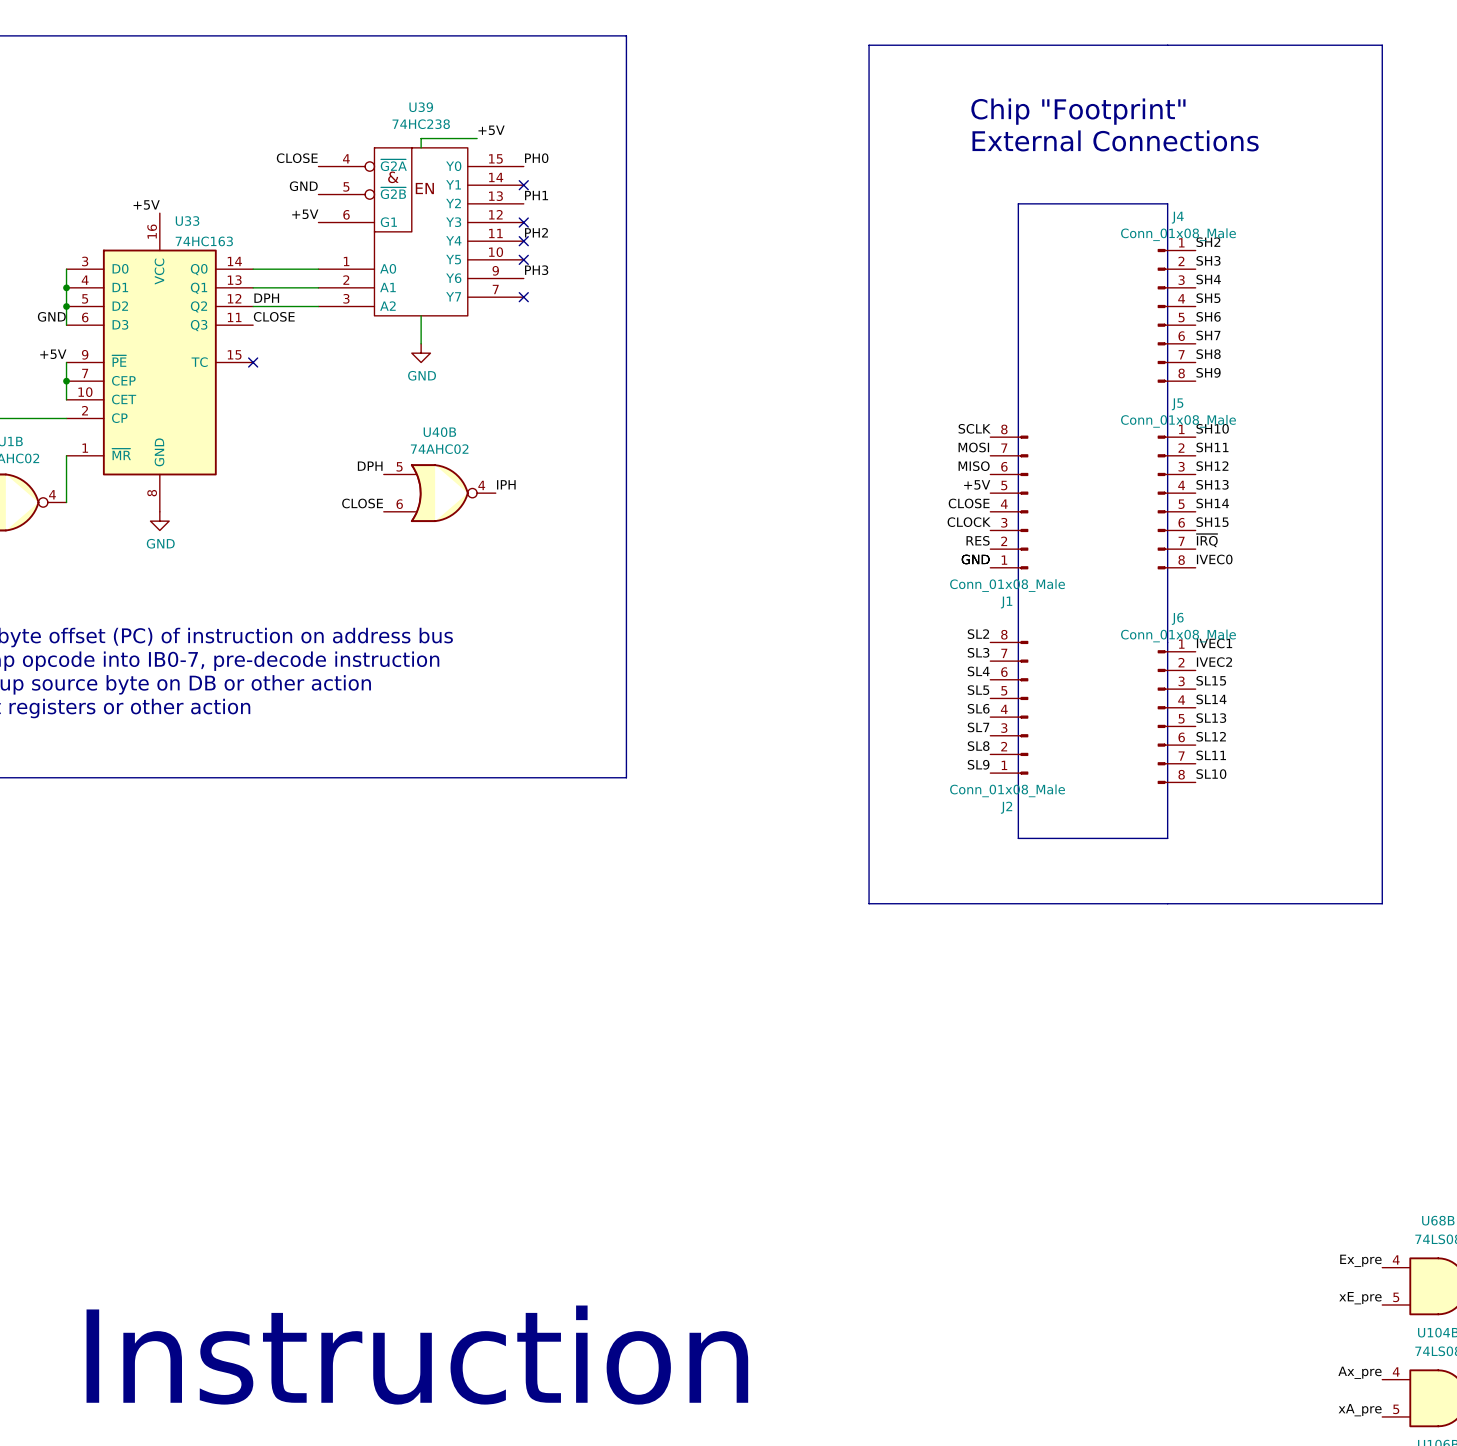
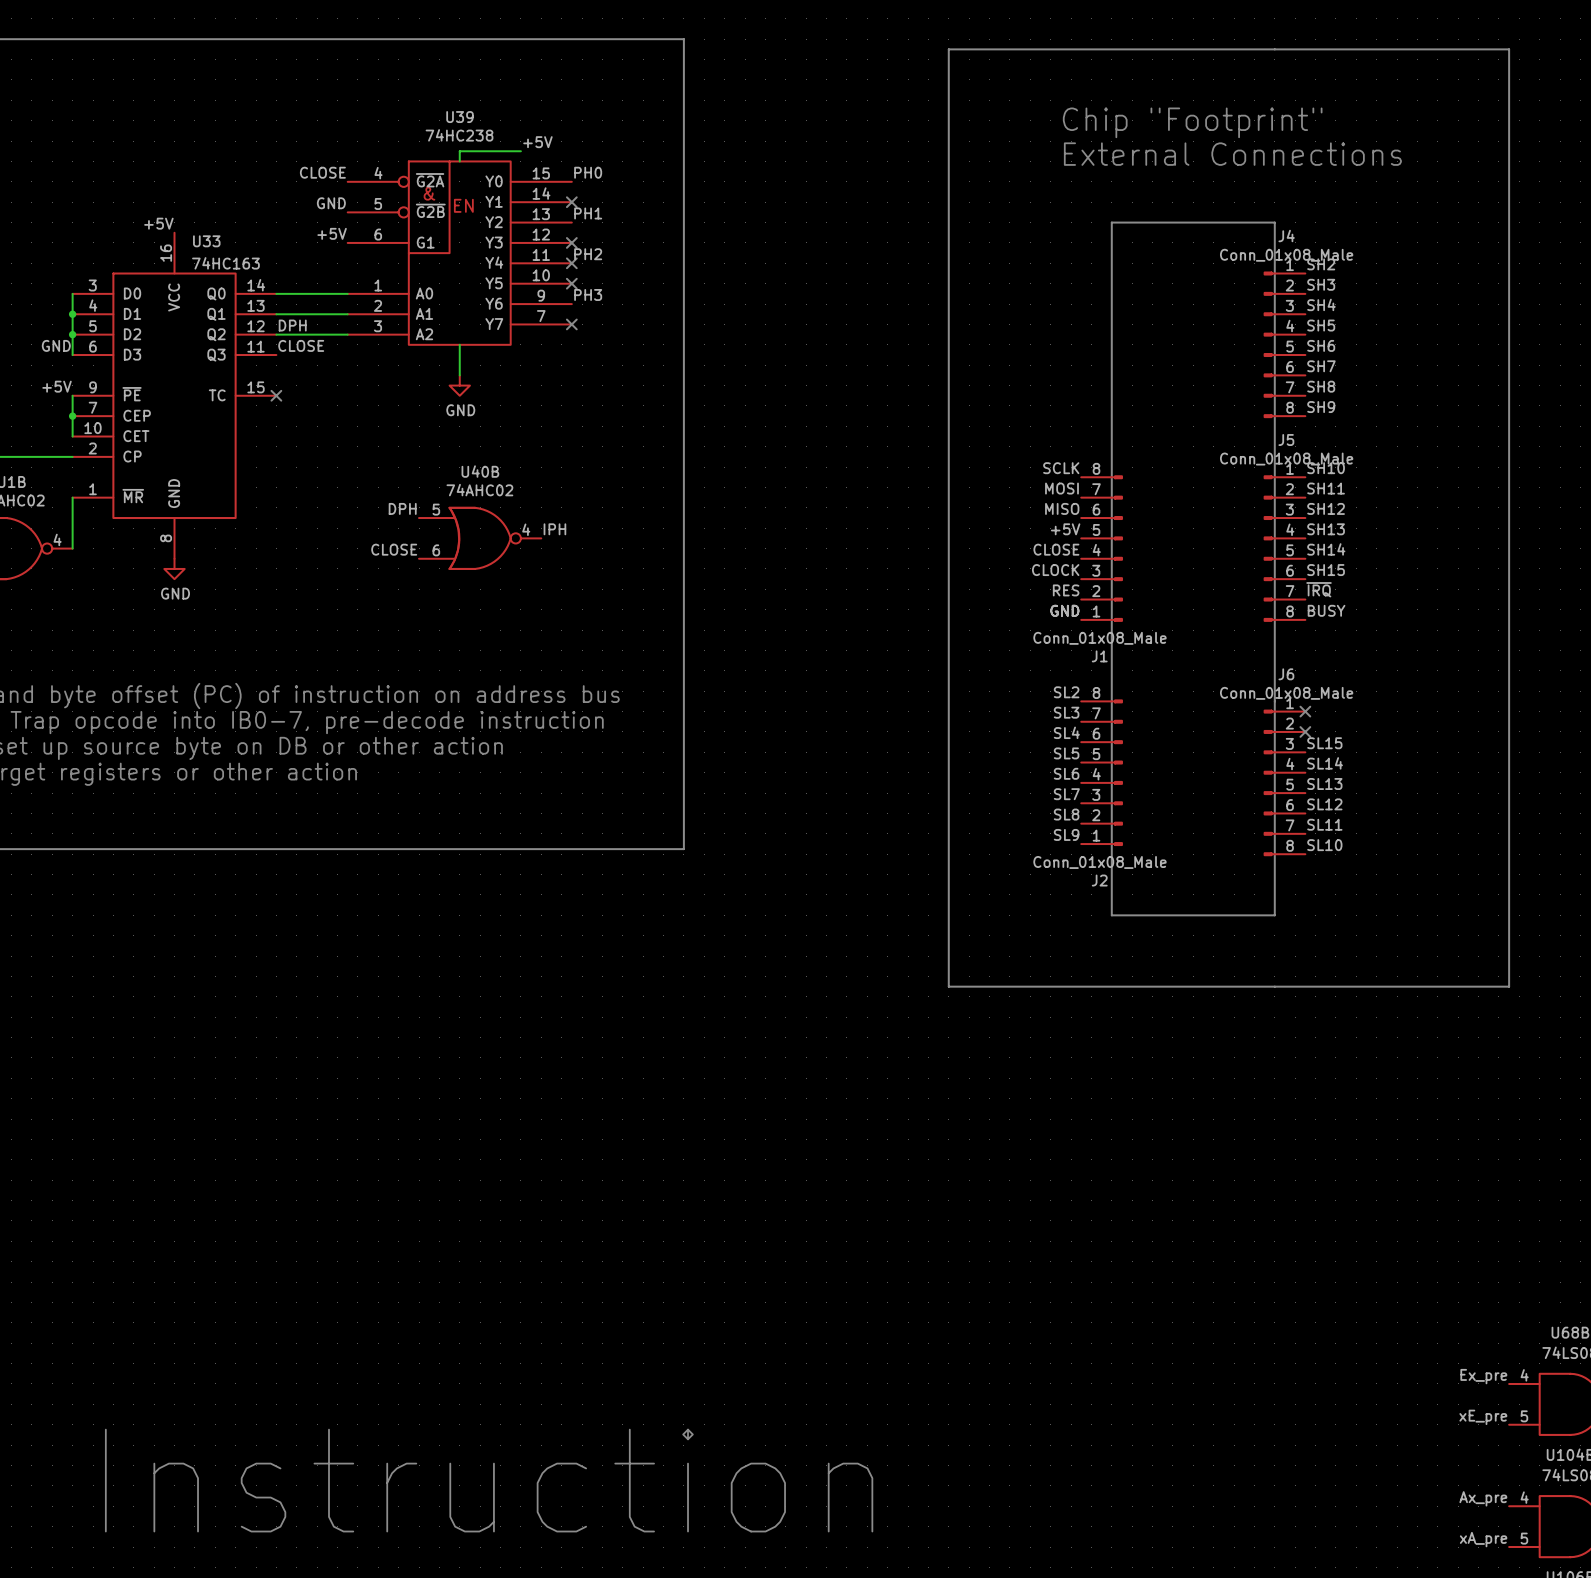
label: IVEC0 (1214, 559) -> BUSY (1326, 610)
label: IVEC1 (1214, 643) -> none
no-connect mark: none -> (1305, 711)
label: IVEC2 (1214, 662) -> none
no-connect mark: none -> (1305, 731)

